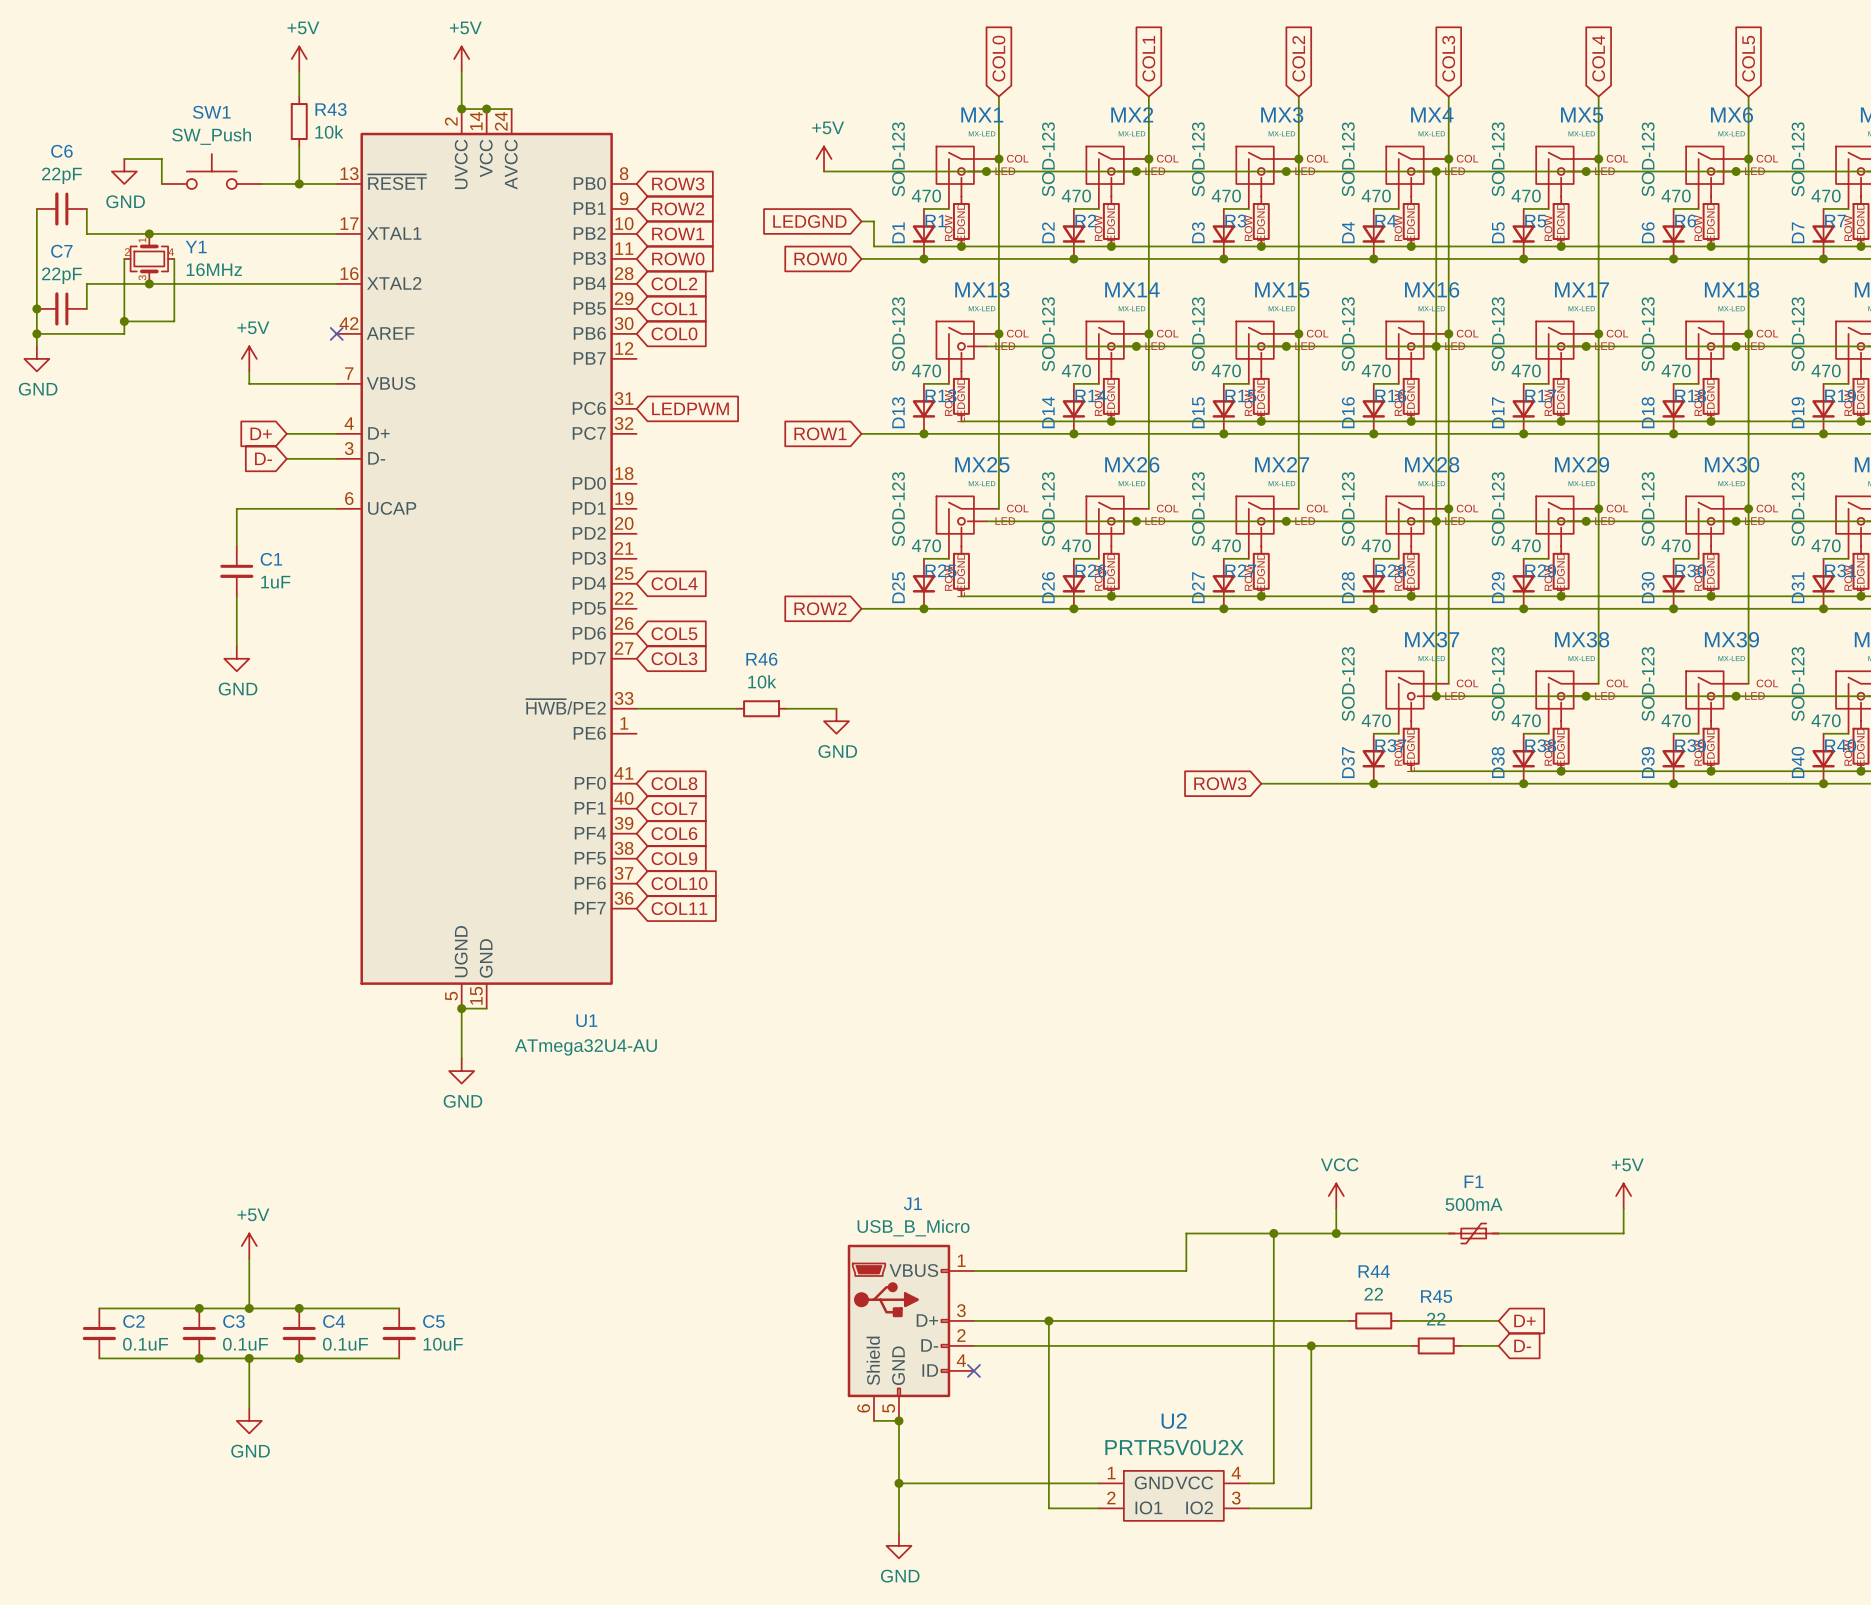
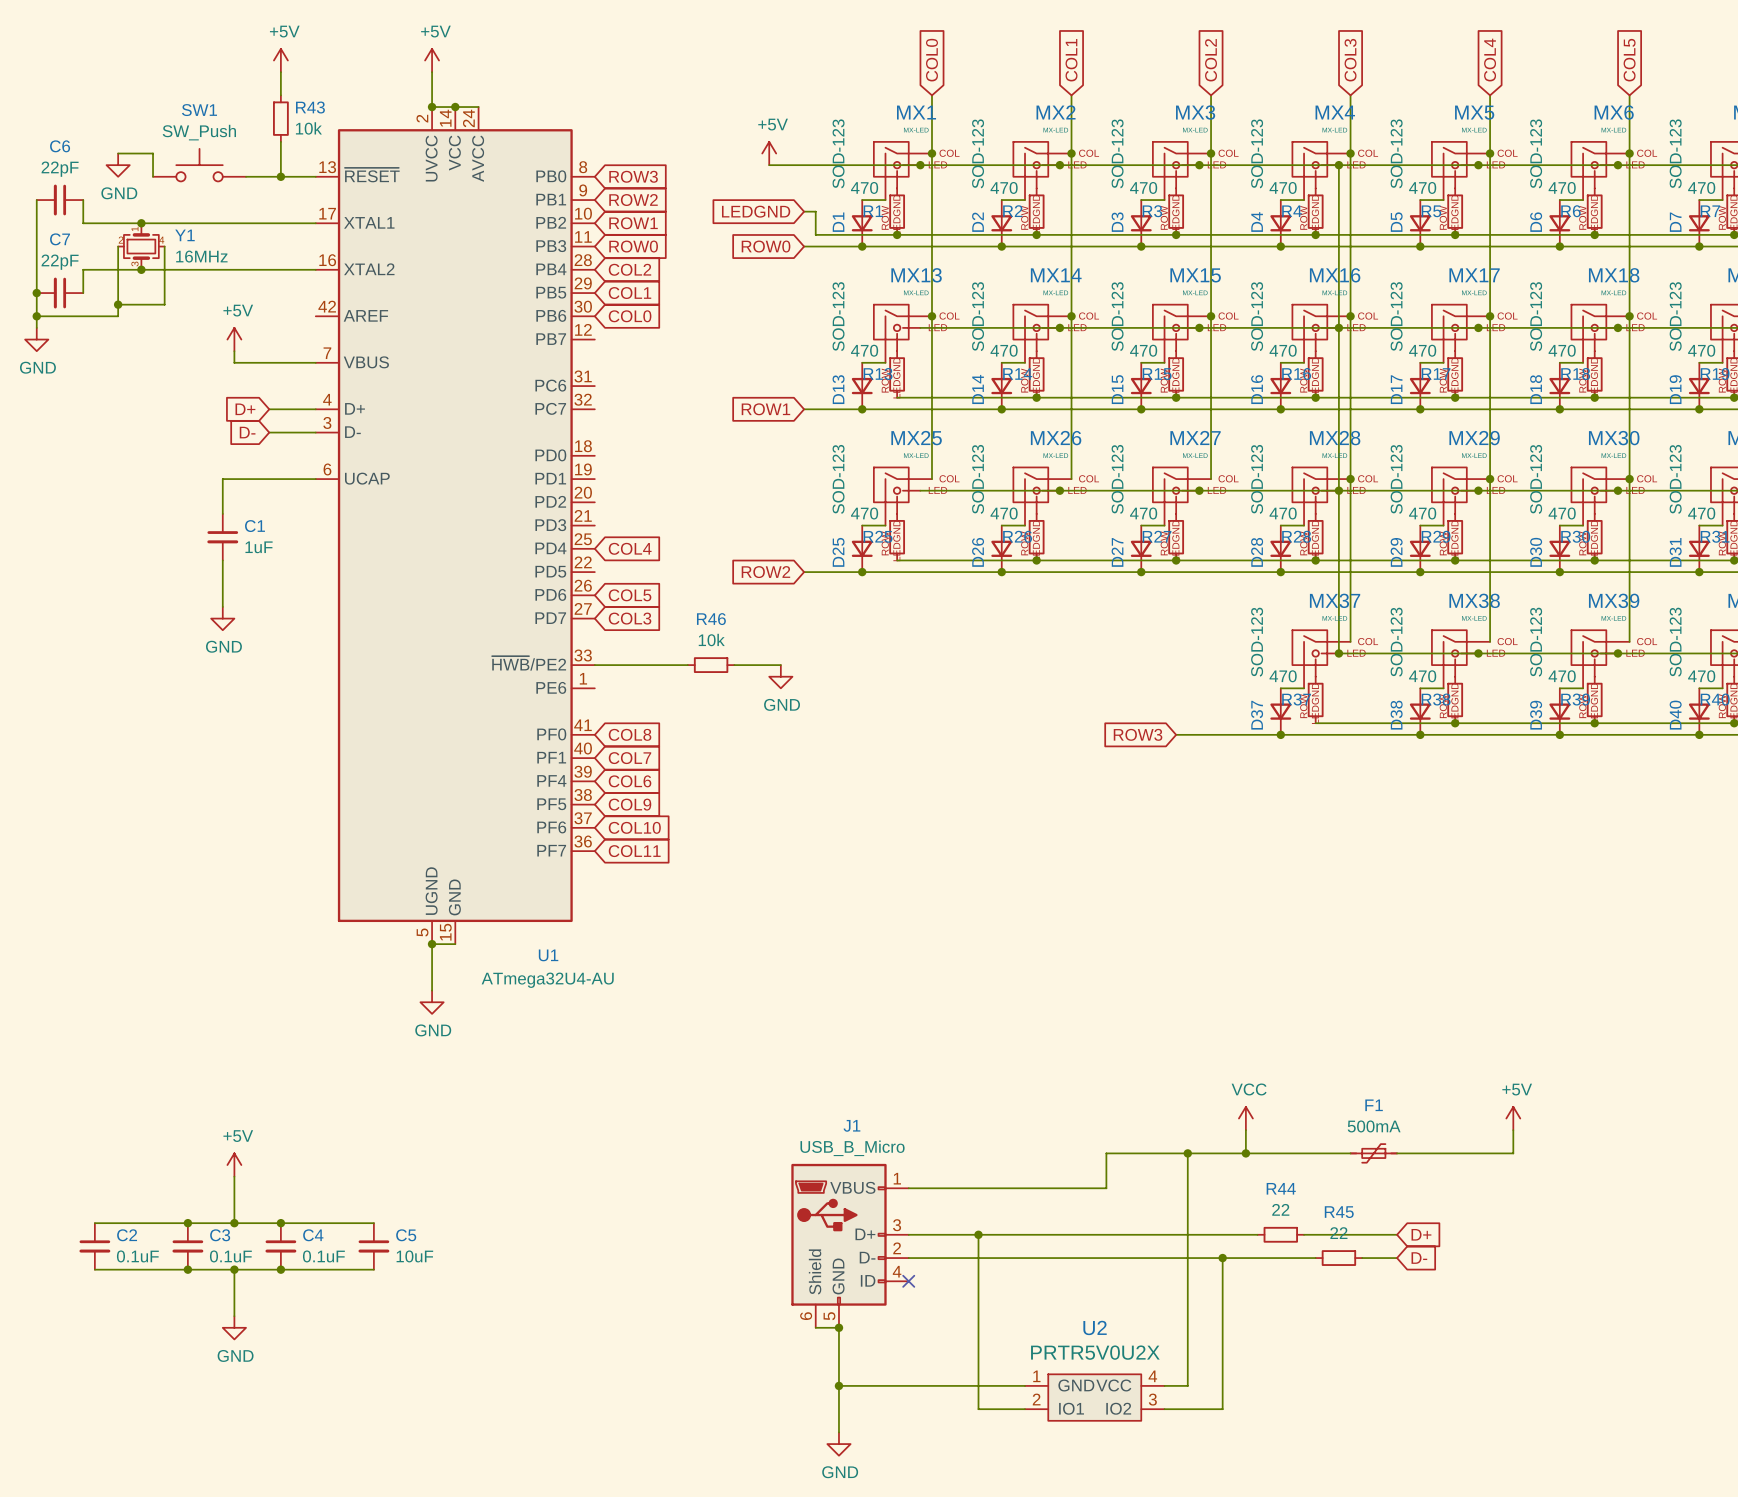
no-connect mark: (336, 333) -> none
global label: LEDPWM (690, 408) -> none

